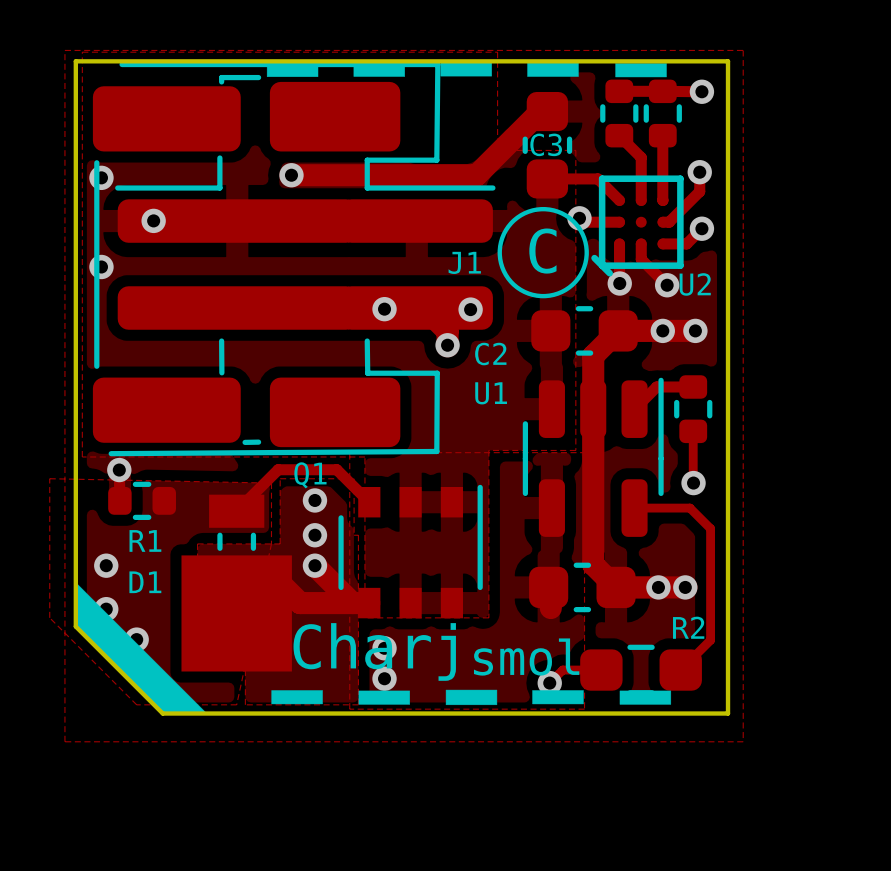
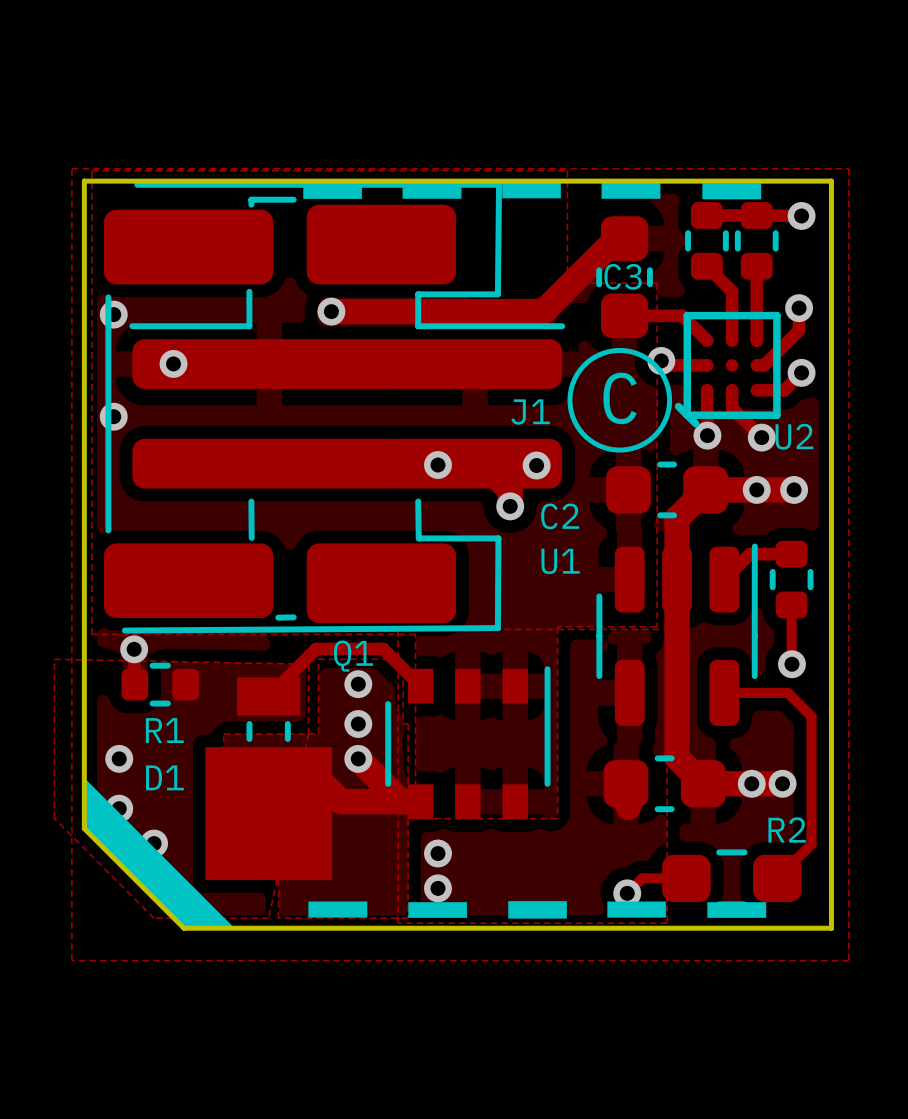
text: Charjsmol (436, 651) -> none

